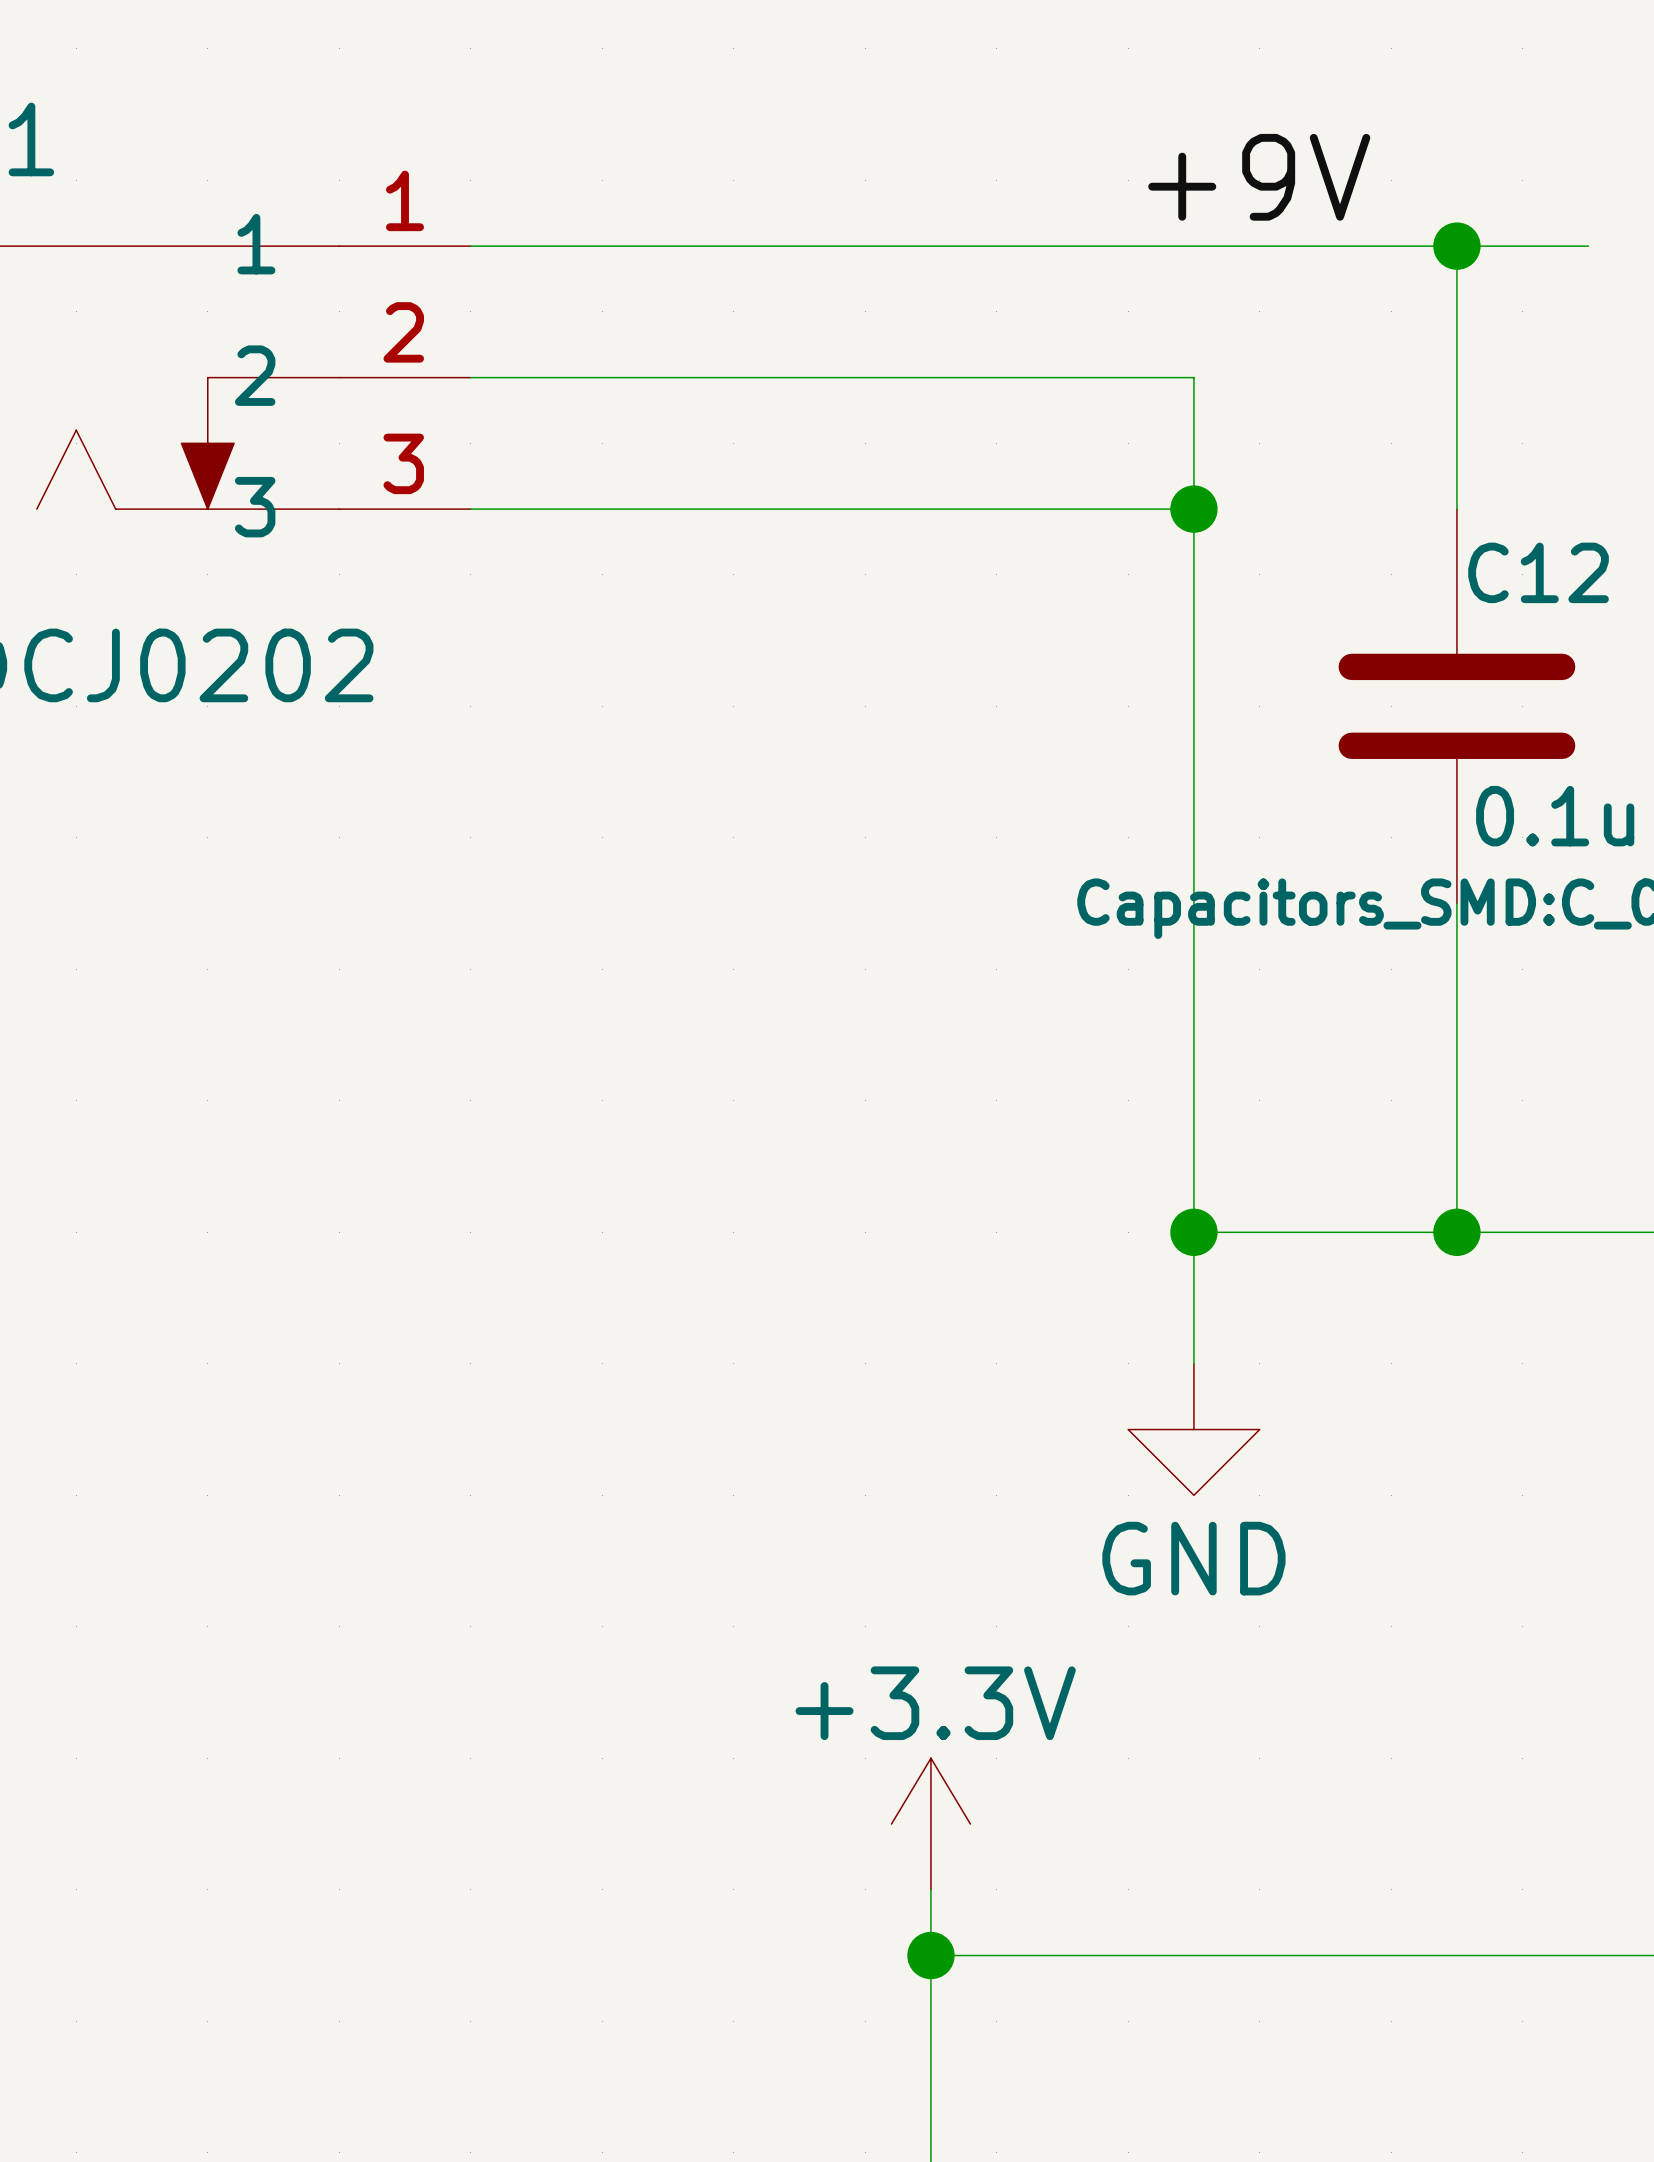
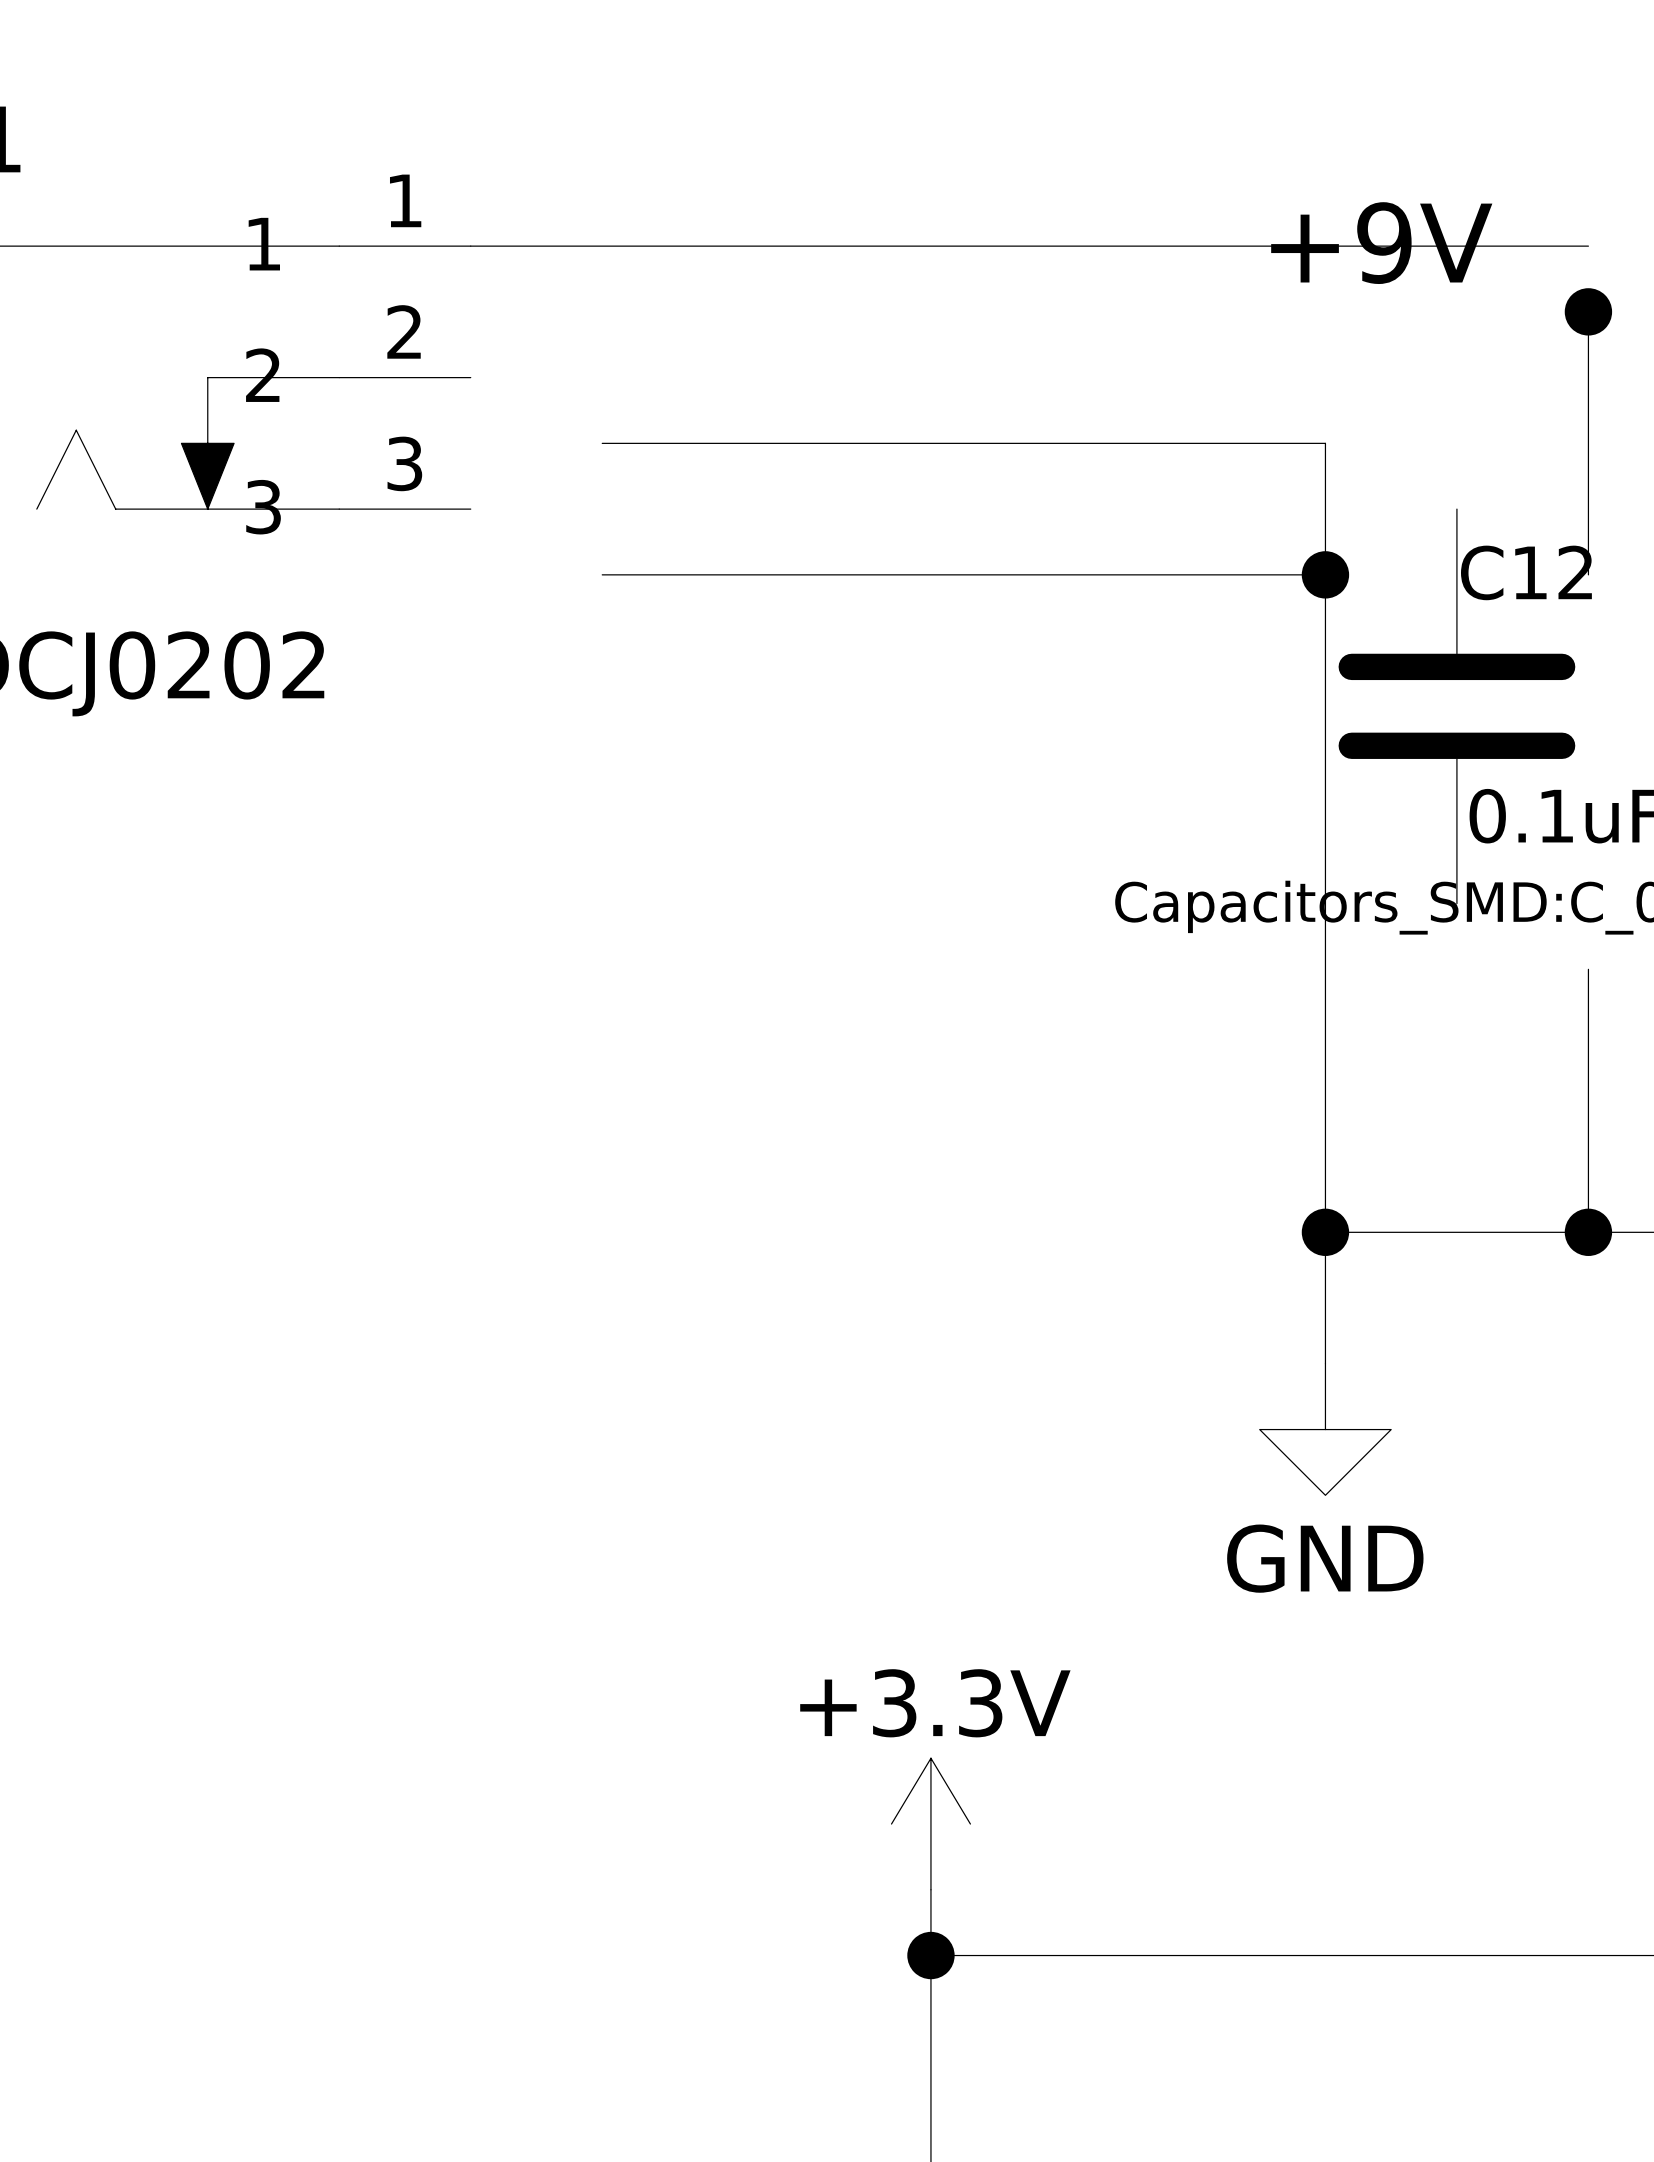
label position: +9V (1259, 177) -> +9V (1381, 243)
wire: (1456, 246) (1456, 509) -> (1588, 311) (1588, 574)
junction position: (1456, 246) -> (1588, 311)
wire: (470, 377) (1193, 377) (1193, 1363) -> none
wire: none -> (602, 443) (1325, 443) (1325, 1363)
wire: (470, 509) (1193, 509) -> (602, 574) (1325, 574)
junction position: (1193, 509) -> (1325, 574)
wire: (1456, 903) (1456, 1232) -> none
wire: none -> (1588, 969) (1588, 1232)
wire: (1193, 1232) (1325, 1232) -> none
junction: (1193, 1232) -> none
junction: none -> (1325, 1232)
junction: (1456, 1232) -> none
junction: none -> (1588, 1232)
power symbol position: GND (1193, 1429) -> GND (1325, 1429)

